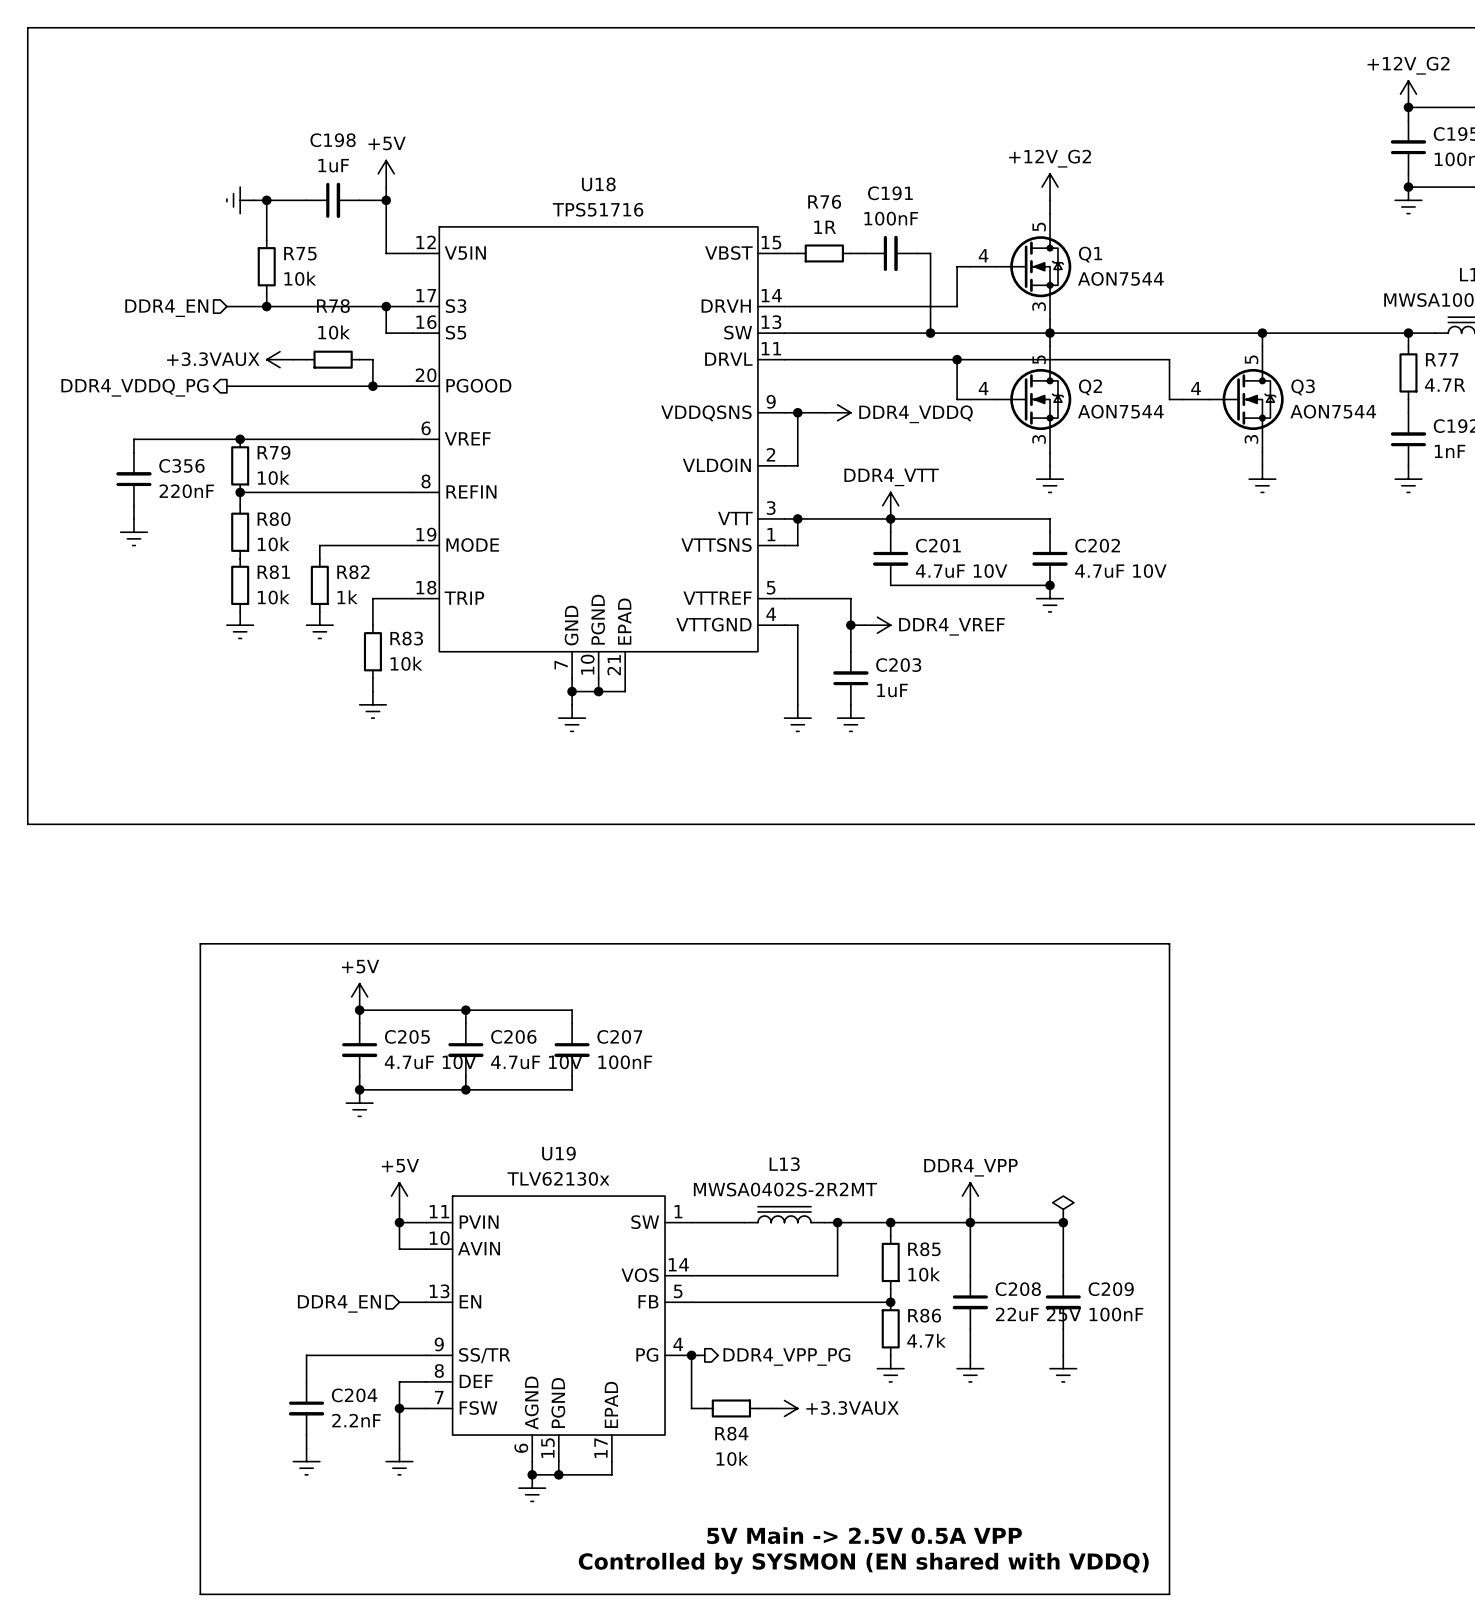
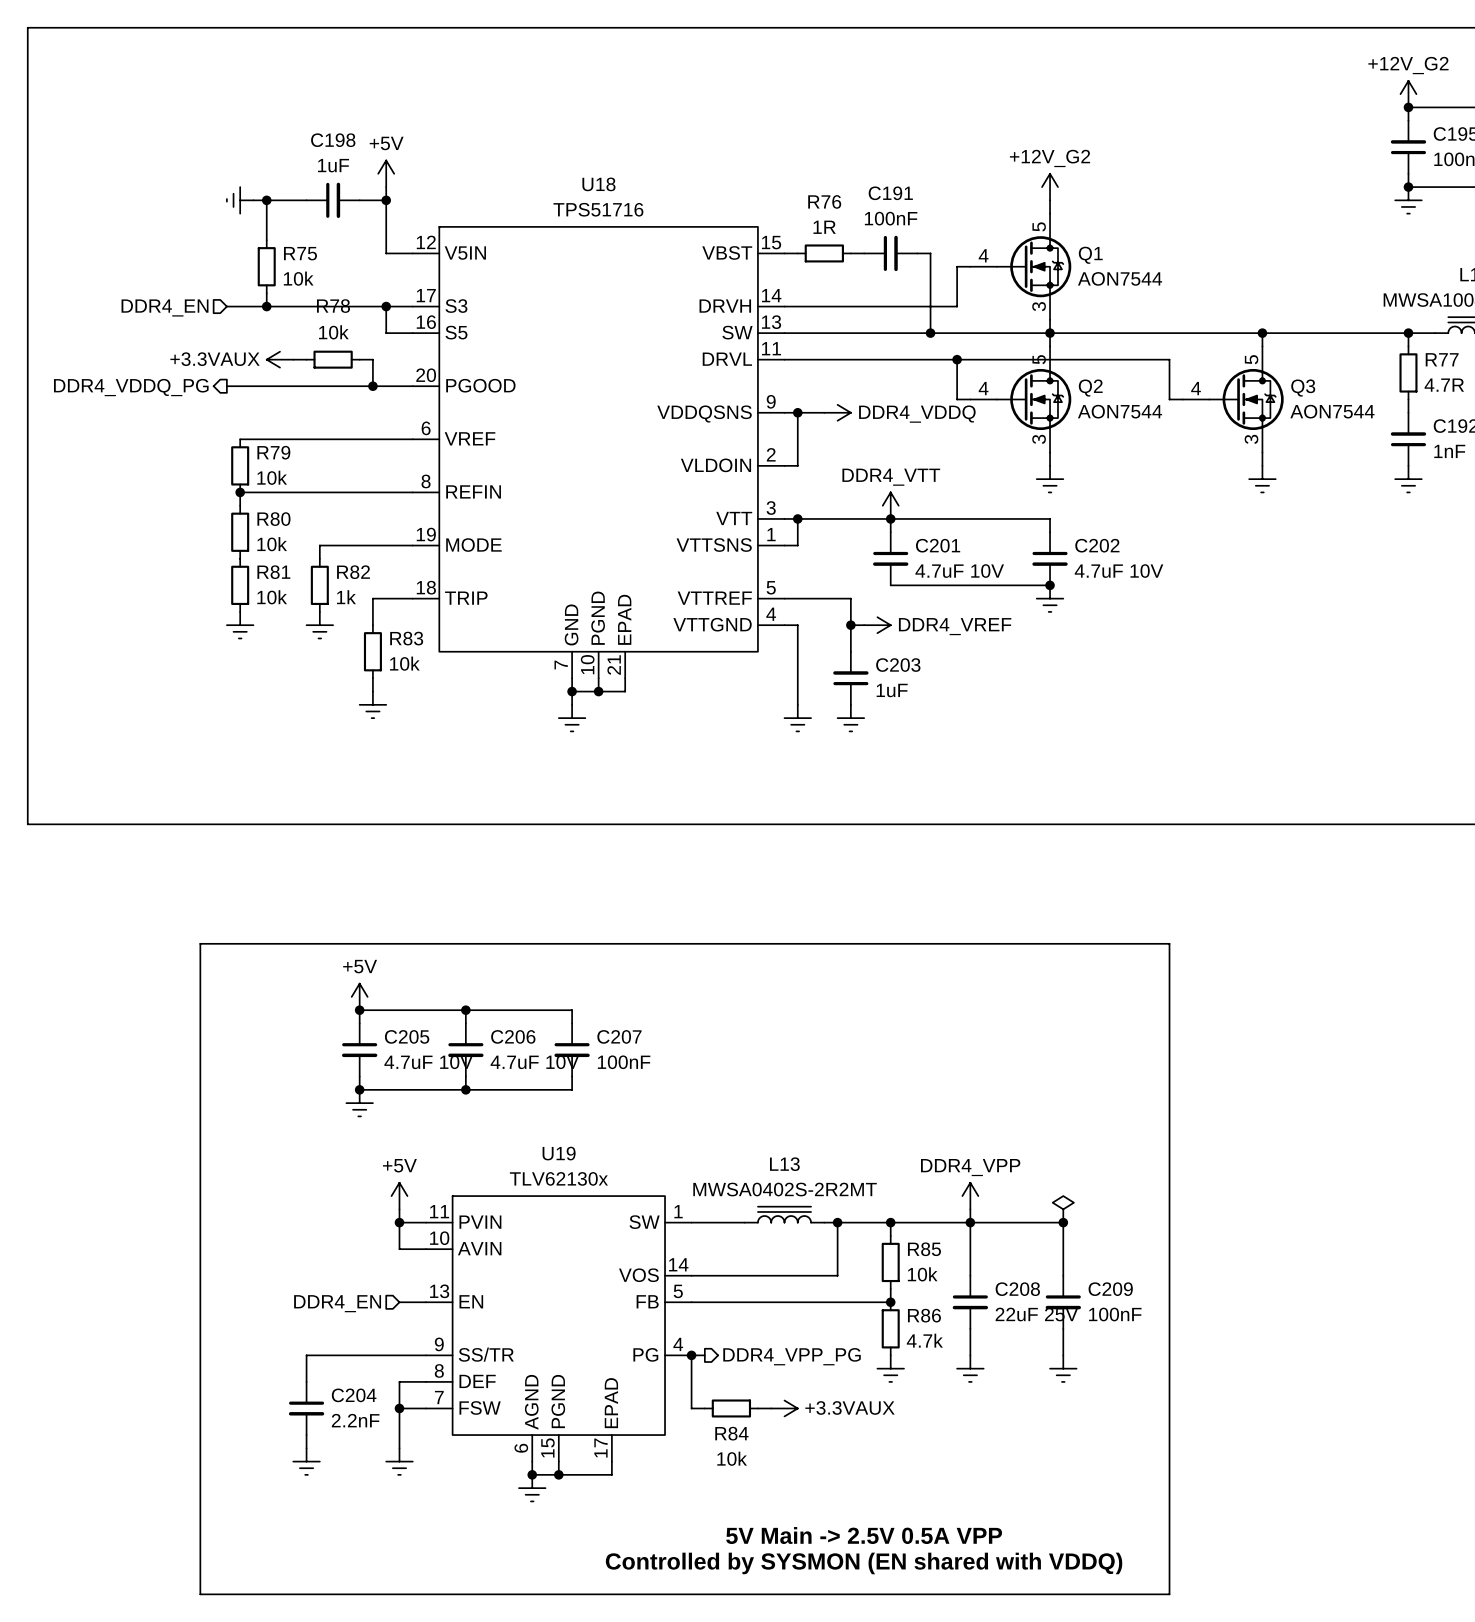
wire: (240, 439) (133, 439) (133, 452) -> none
junction: (240, 439) -> none
C356: 220nF (133, 479) -> none
wire: (133, 505) (133, 518) -> none
power symbol: (133, 532) -> none

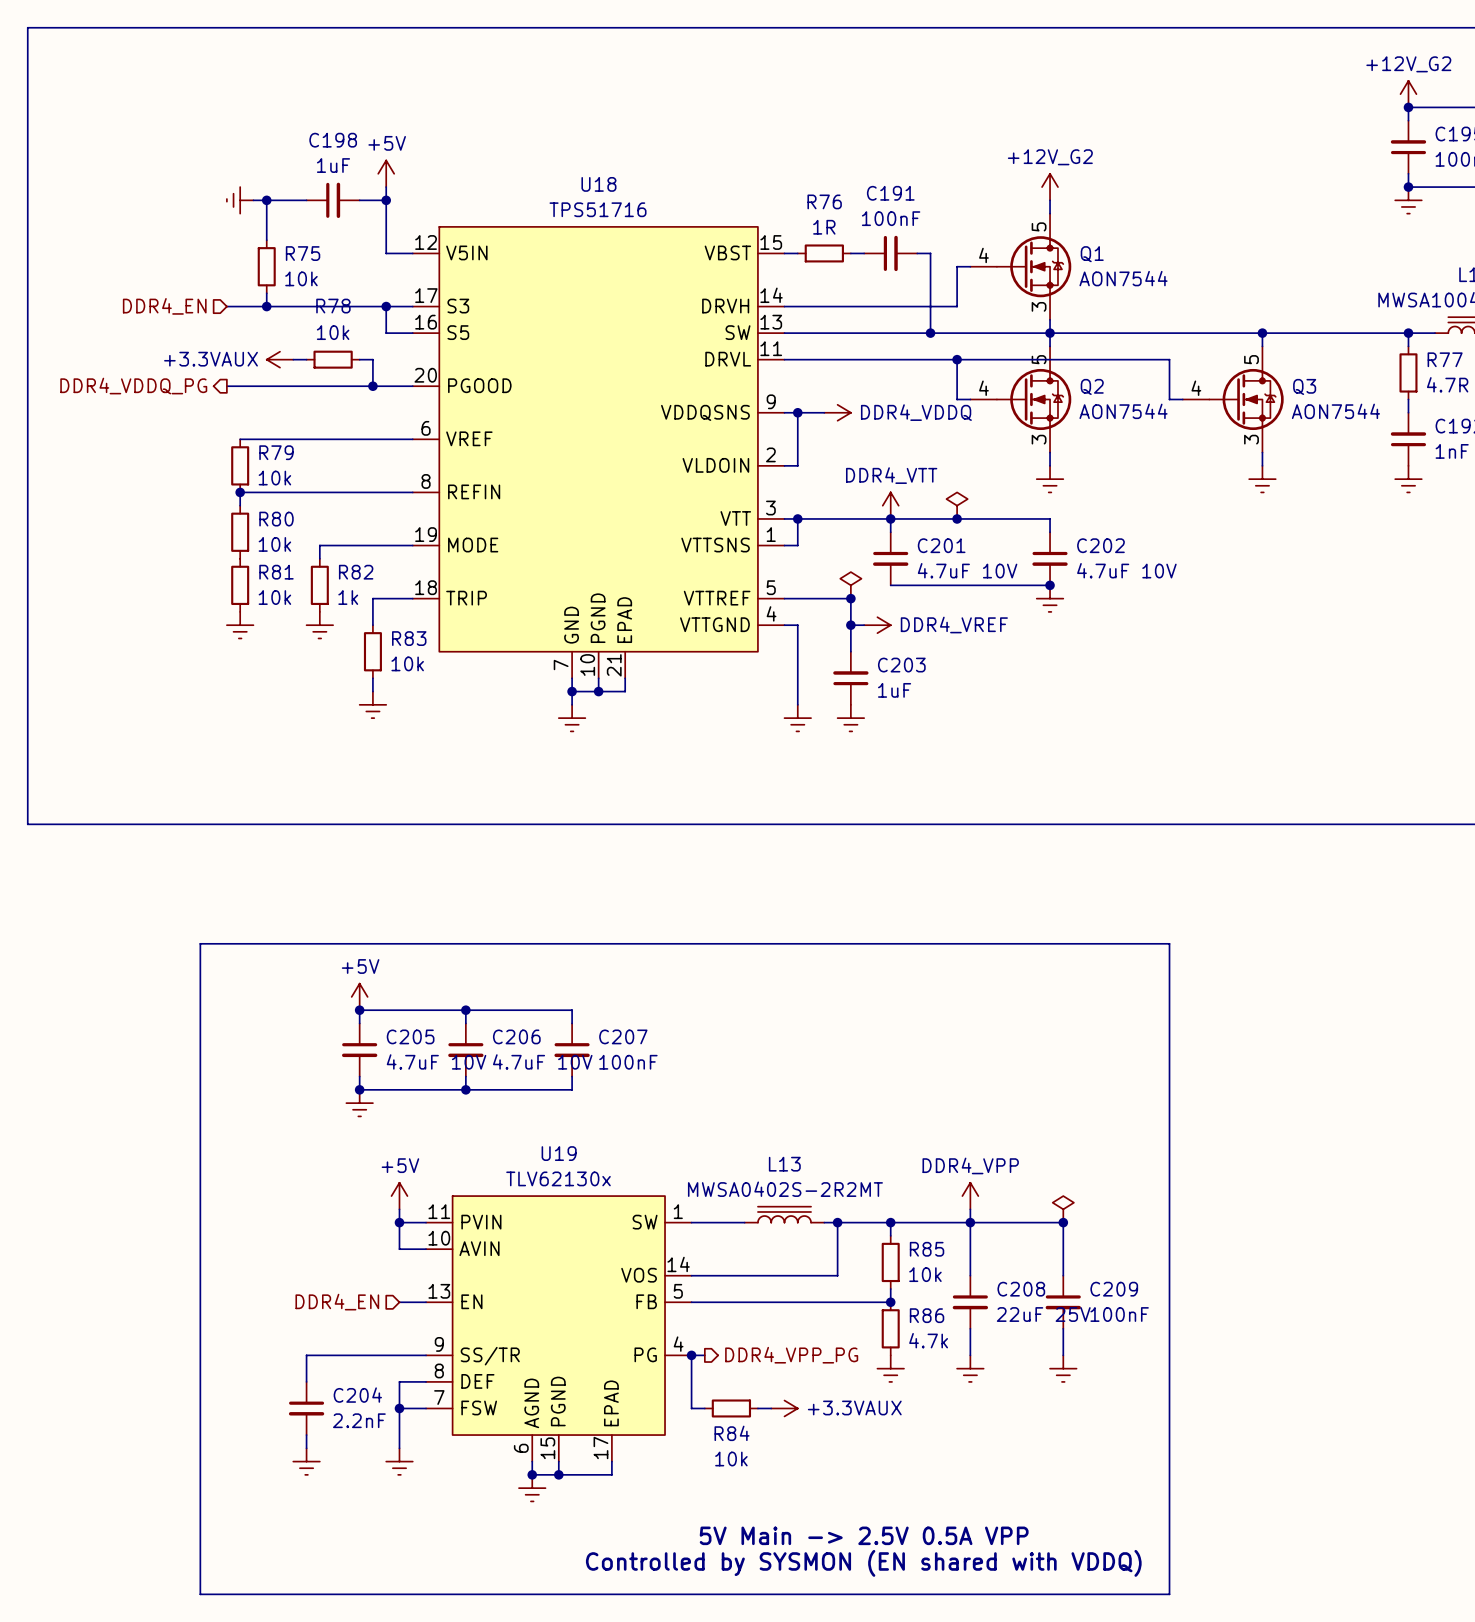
power symbol: none -> (957, 505)
junction: none -> (957, 518)
power symbol: none -> (850, 585)
junction: none -> (850, 598)

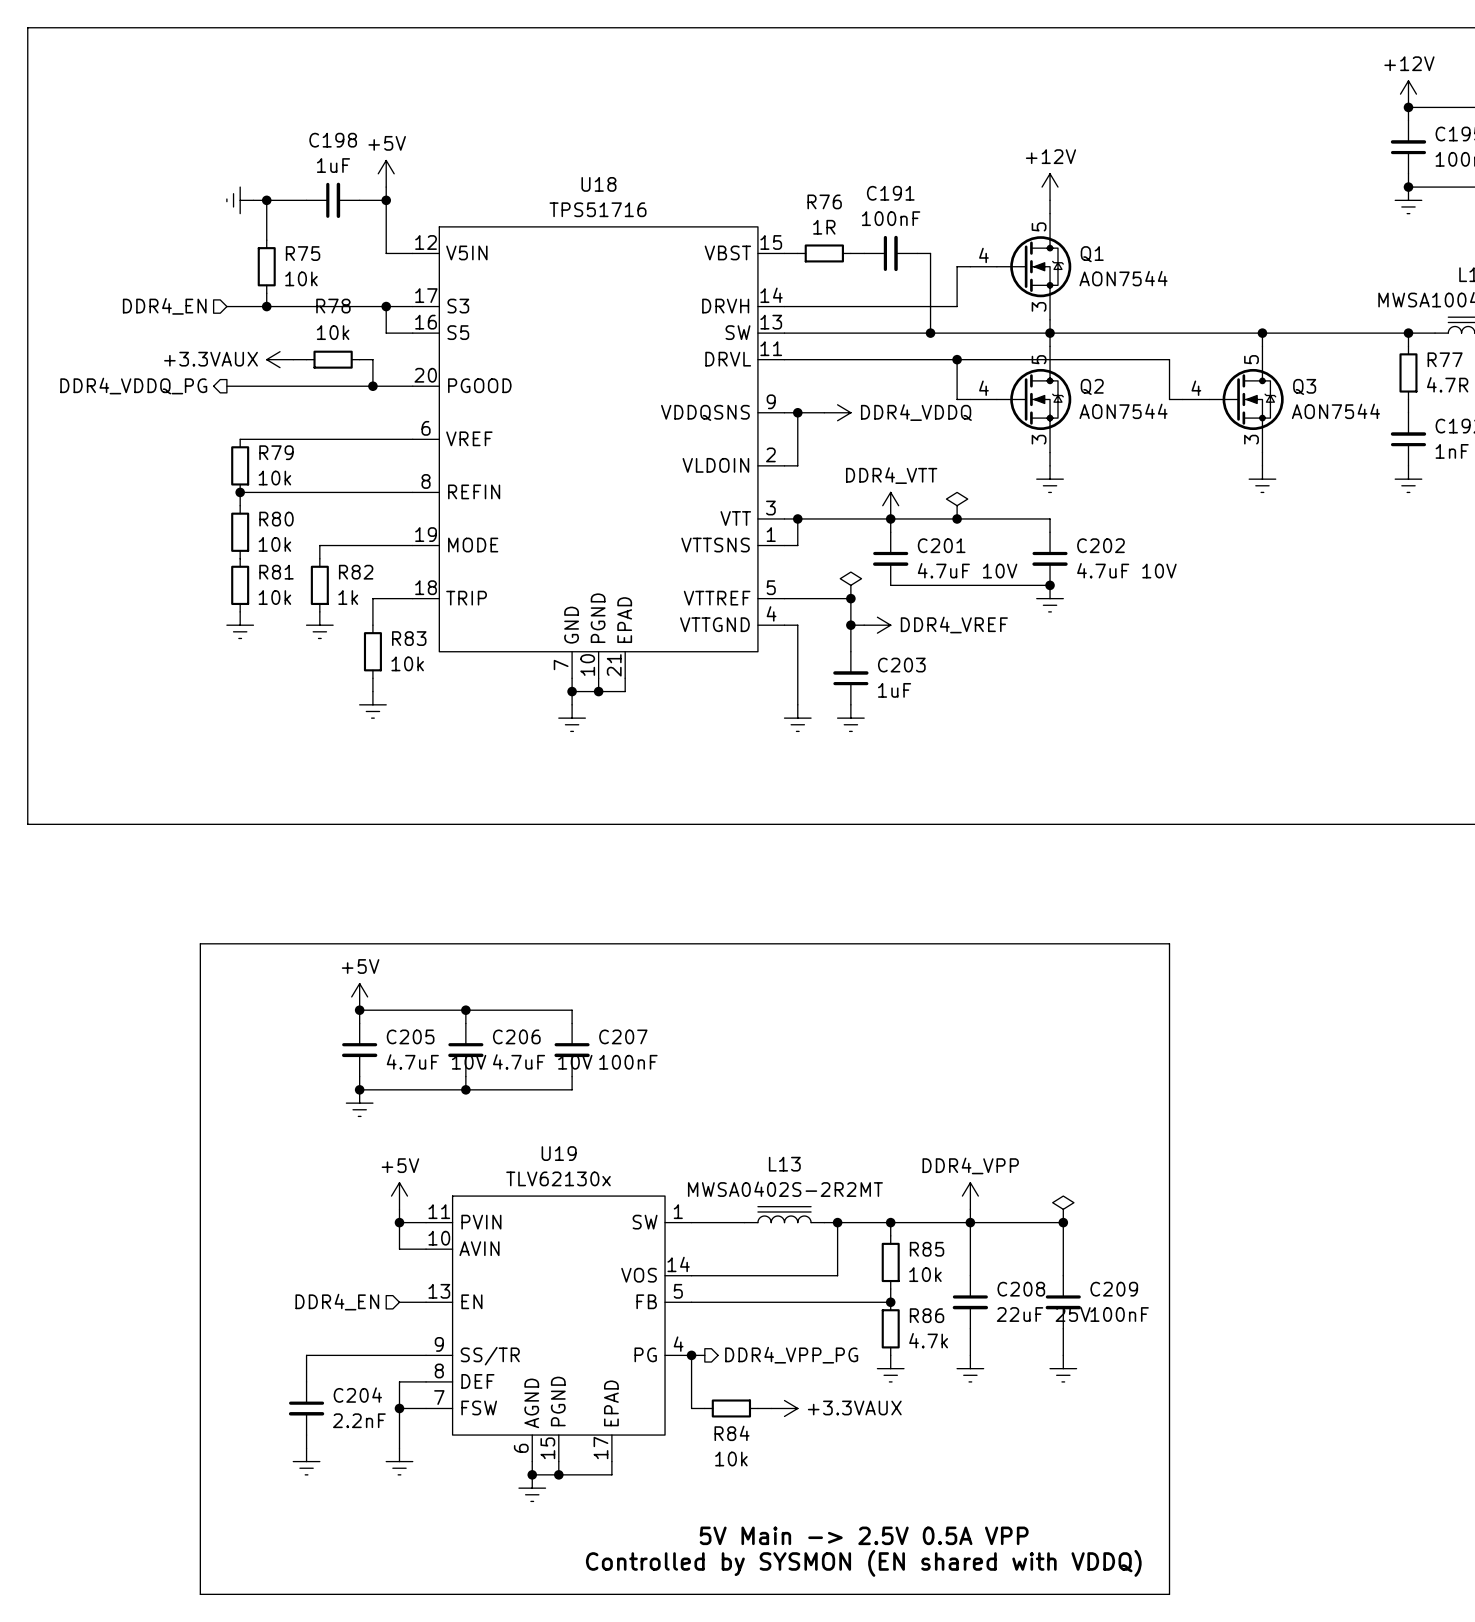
power symbol: +12V_G2 (1408, 94) -> +12V (1408, 94)
power symbol: +12V_G2 (1050, 187) -> +12V (1050, 187)

